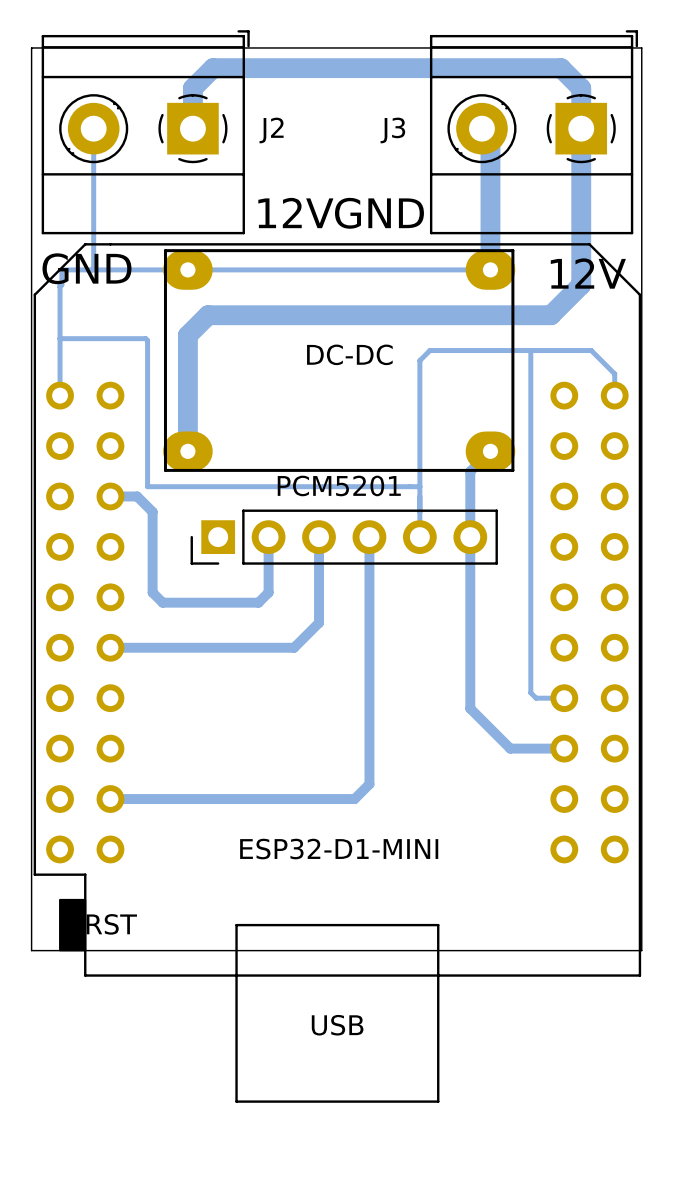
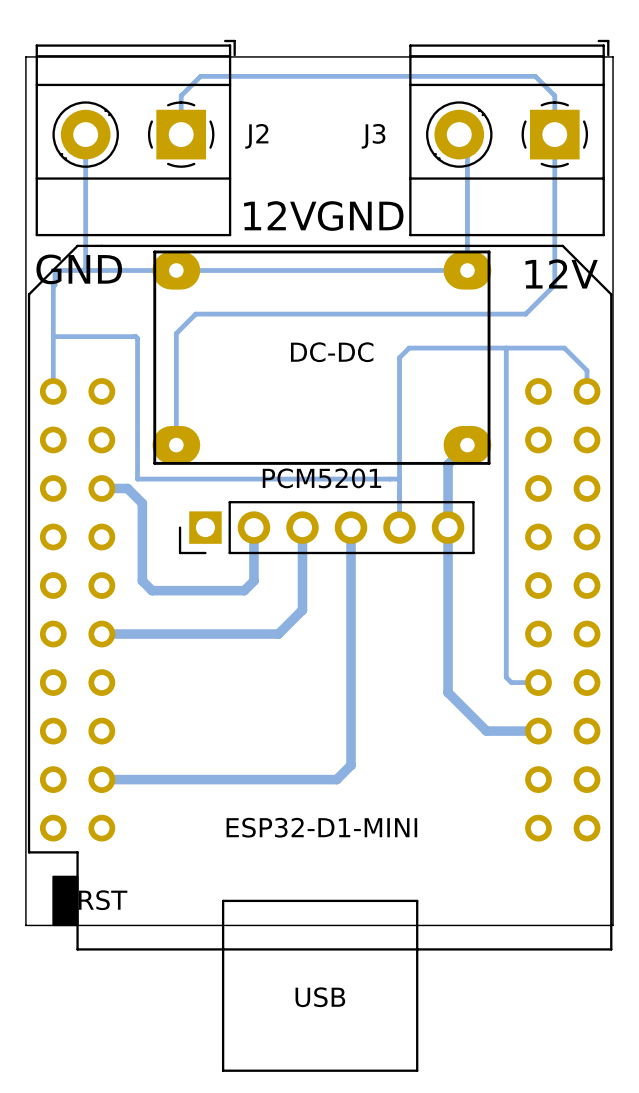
bottom track width: thick (192, 128) (192, 88) (213, 68) (561, 68) (581, 88) (581, 284) (550, 315) (208, 315) (187, 335) (187, 451) -> thin (181, 134) (181, 95) (200, 76) (535, 76) (554, 95) (554, 285) (525, 314) (195, 314) (176, 333) (176, 445)
bottom track width: thick (490, 137) (490, 269) -> thin (467, 142) (467, 270)

